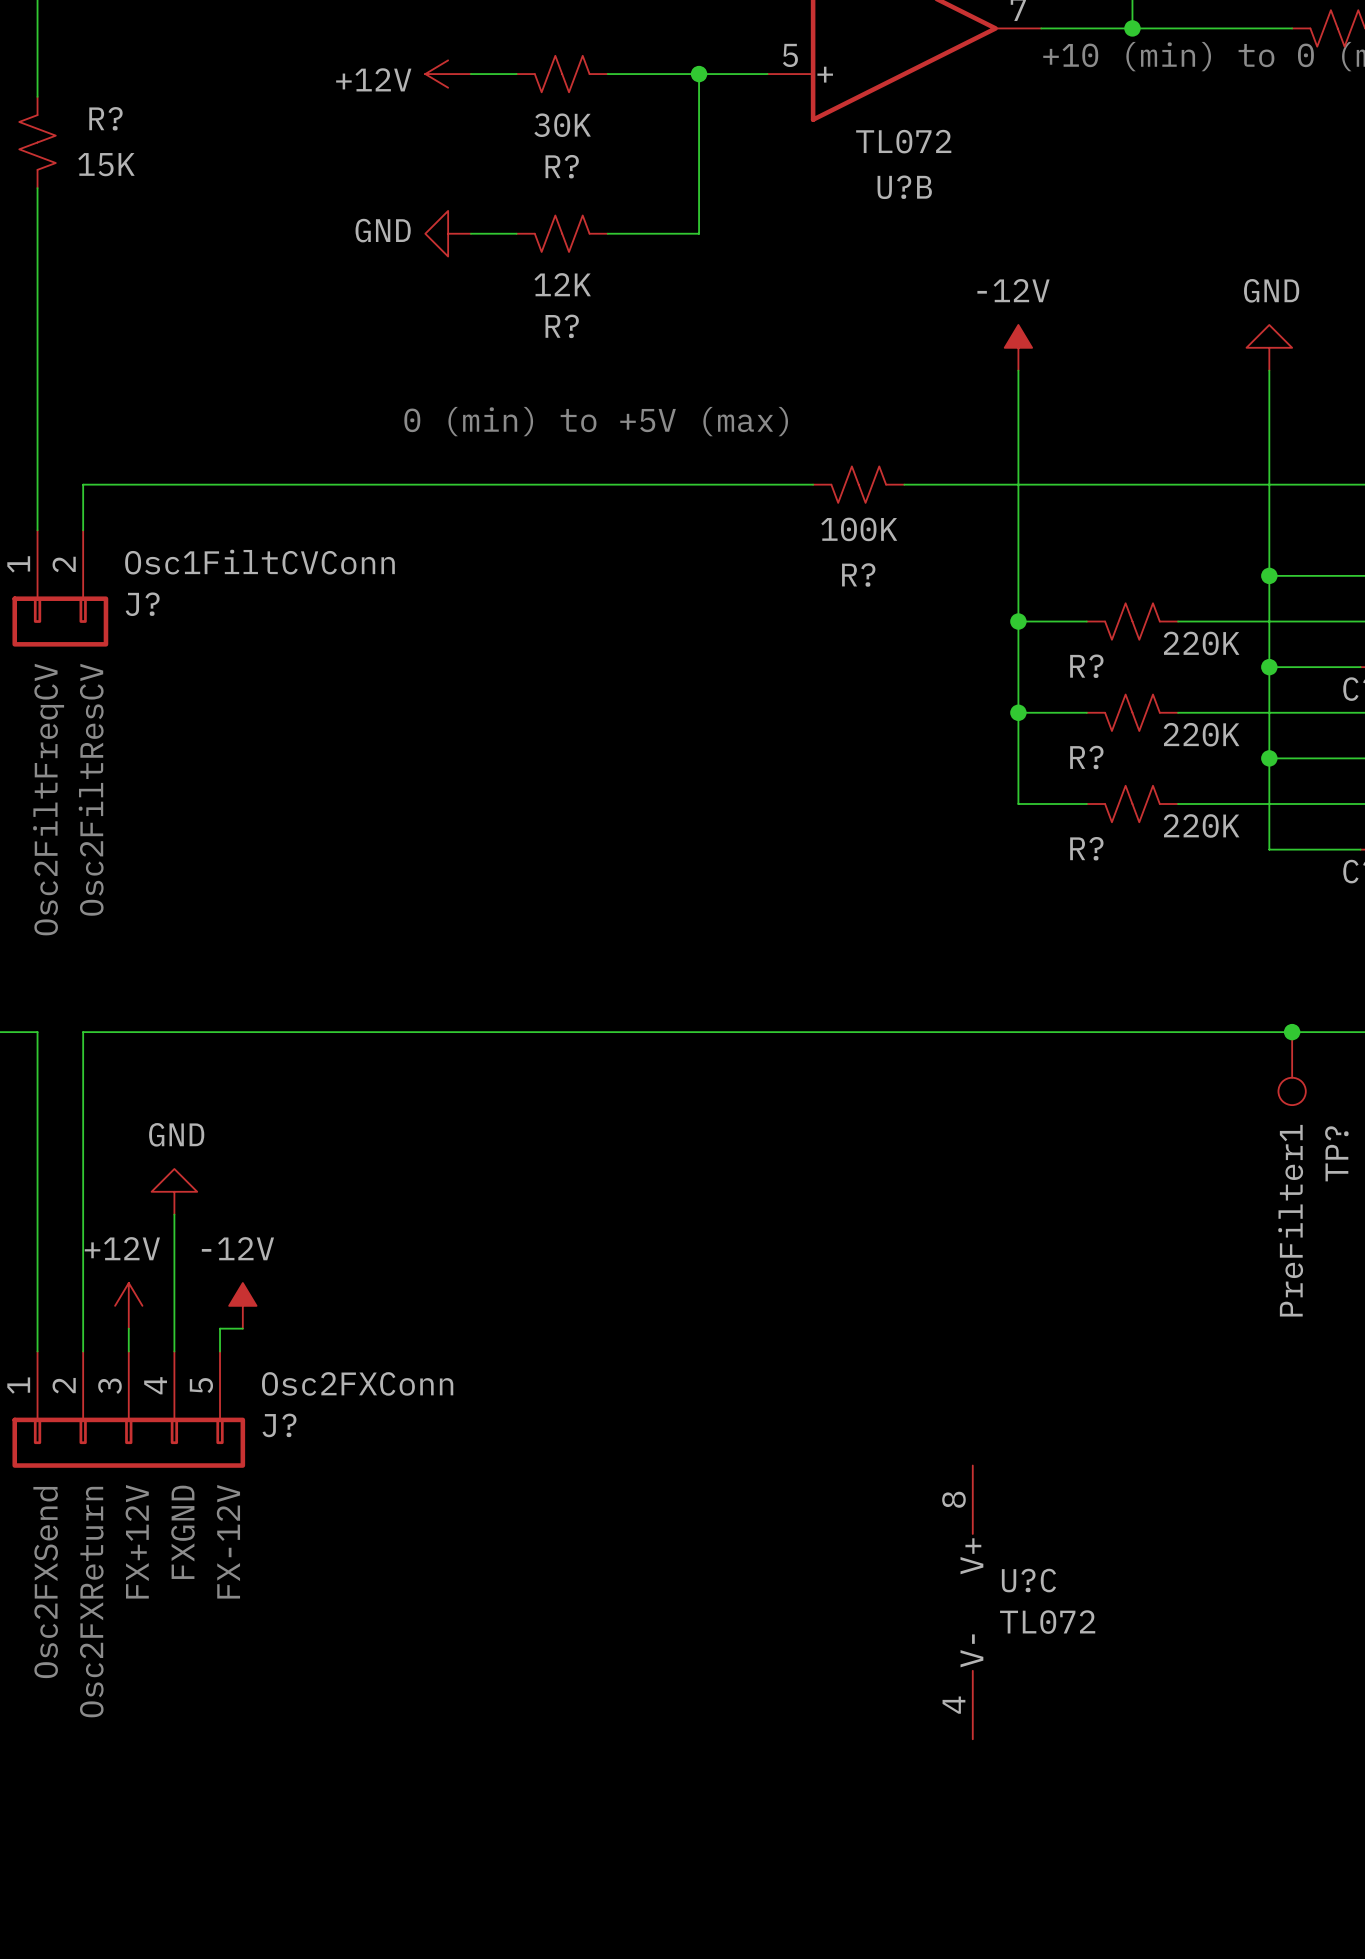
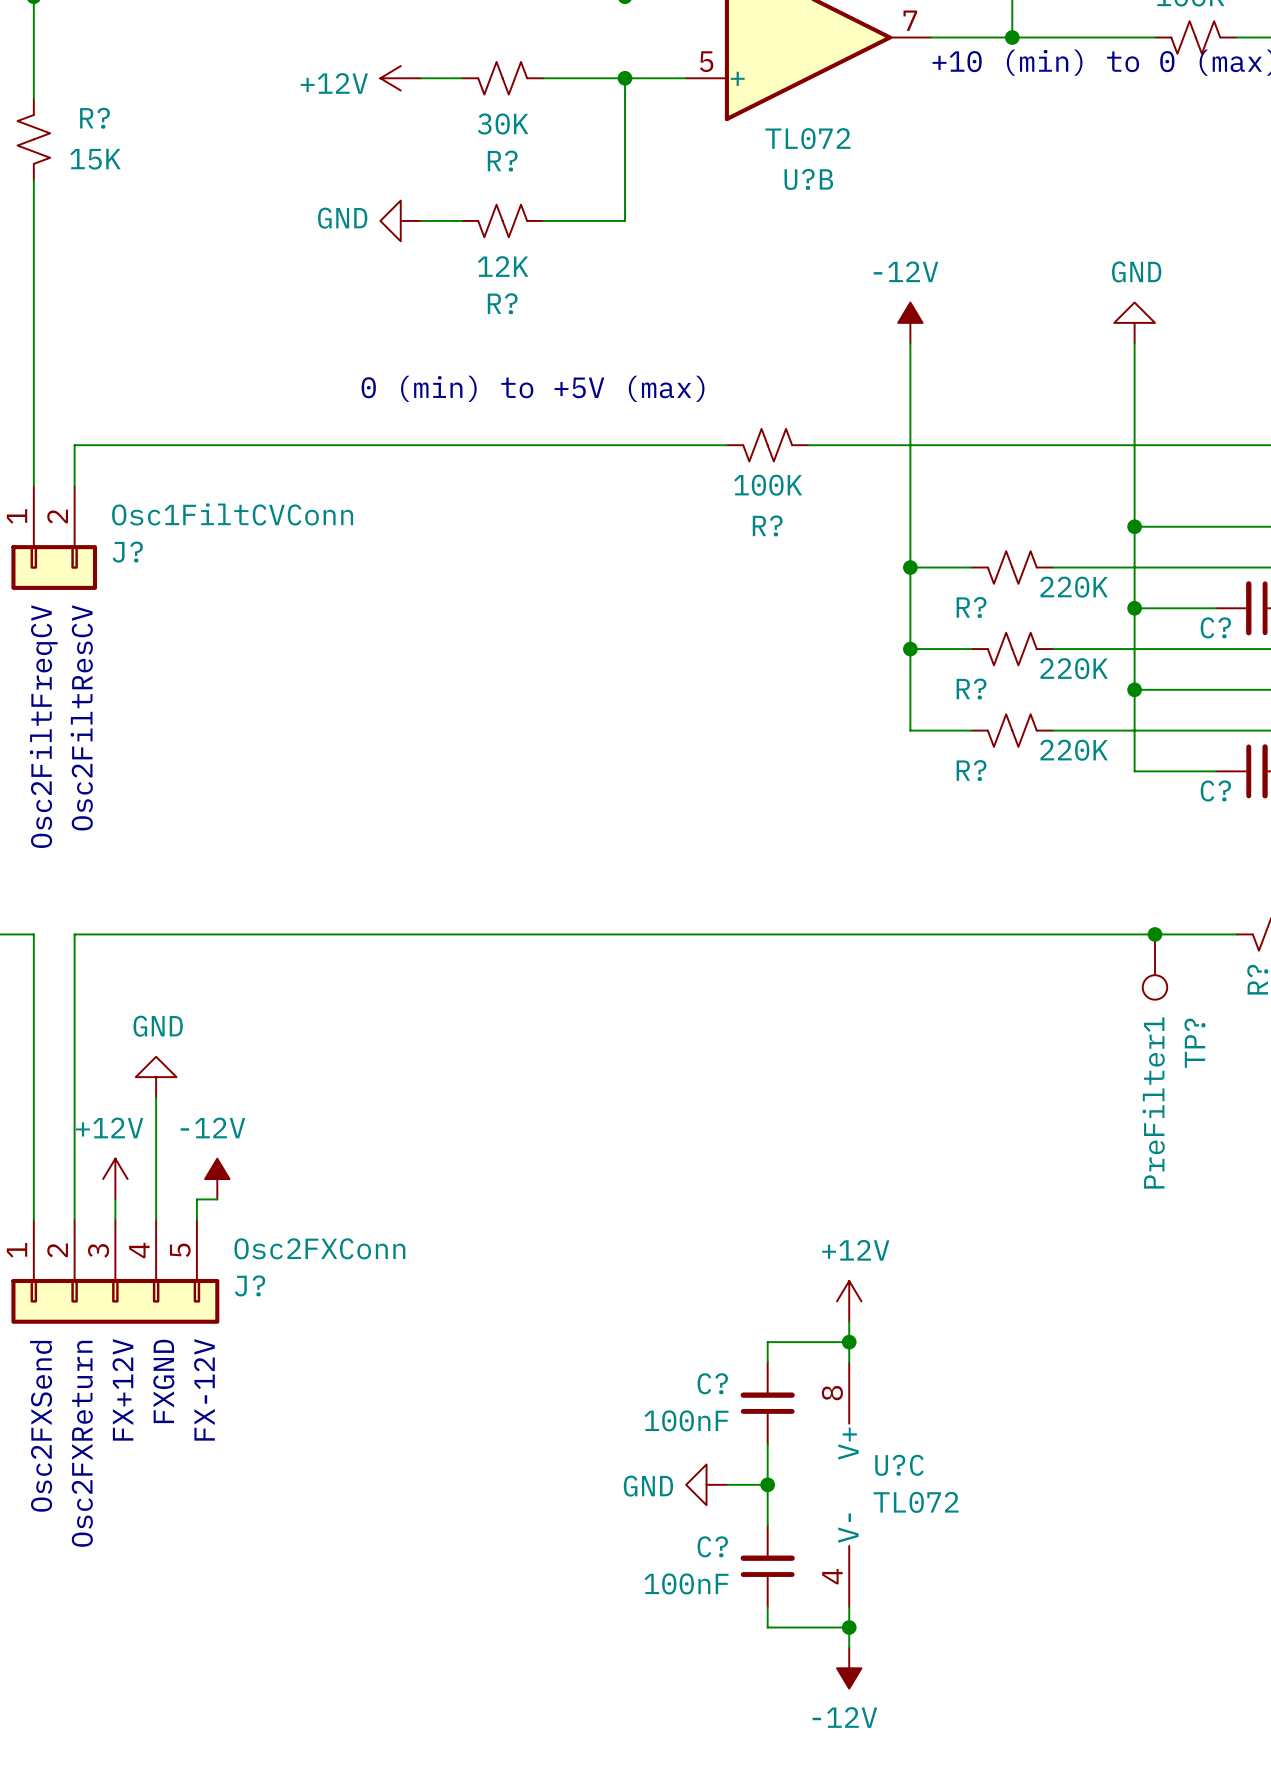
power symbol: none -> +12V (849, 1301)
wire: none -> (849, 1321) (849, 1362)
wire: none -> (849, 1342) (767, 1342) (767, 1362)
junction: none -> (849, 1342)
C?: none -> 100nF (767, 1403)
wire: none -> (767, 1444) (767, 1525)
U?C position: (972, 1602) -> (849, 1484)
power symbol: none -> GND (706, 1484)
wire: none -> (726, 1484) (767, 1484)
junction: none -> (767, 1484)
C?: none -> 100nF (767, 1566)
wire: none -> (767, 1607) (767, 1627) (849, 1627)
wire: none -> (849, 1607) (849, 1647)
junction: none -> (849, 1627)
power symbol: none -> -12V (849, 1668)

